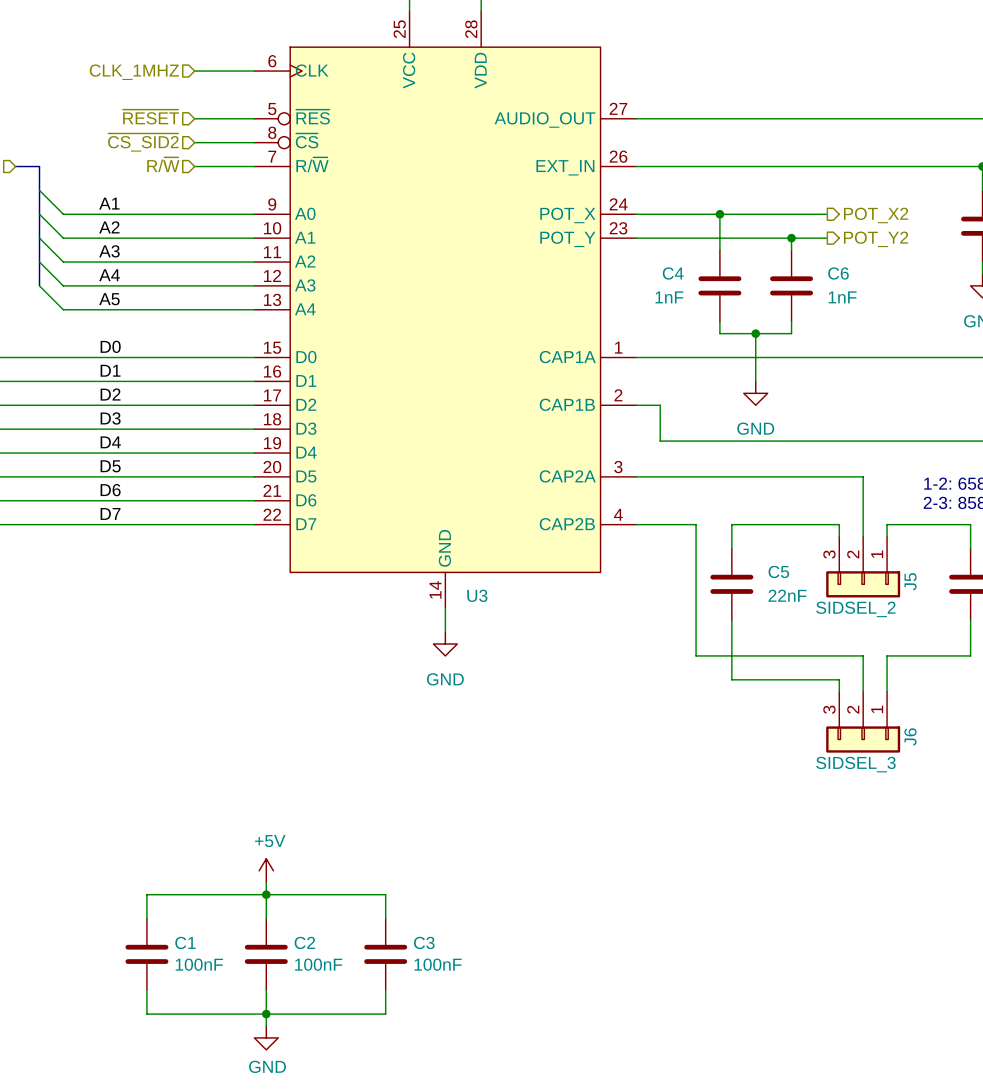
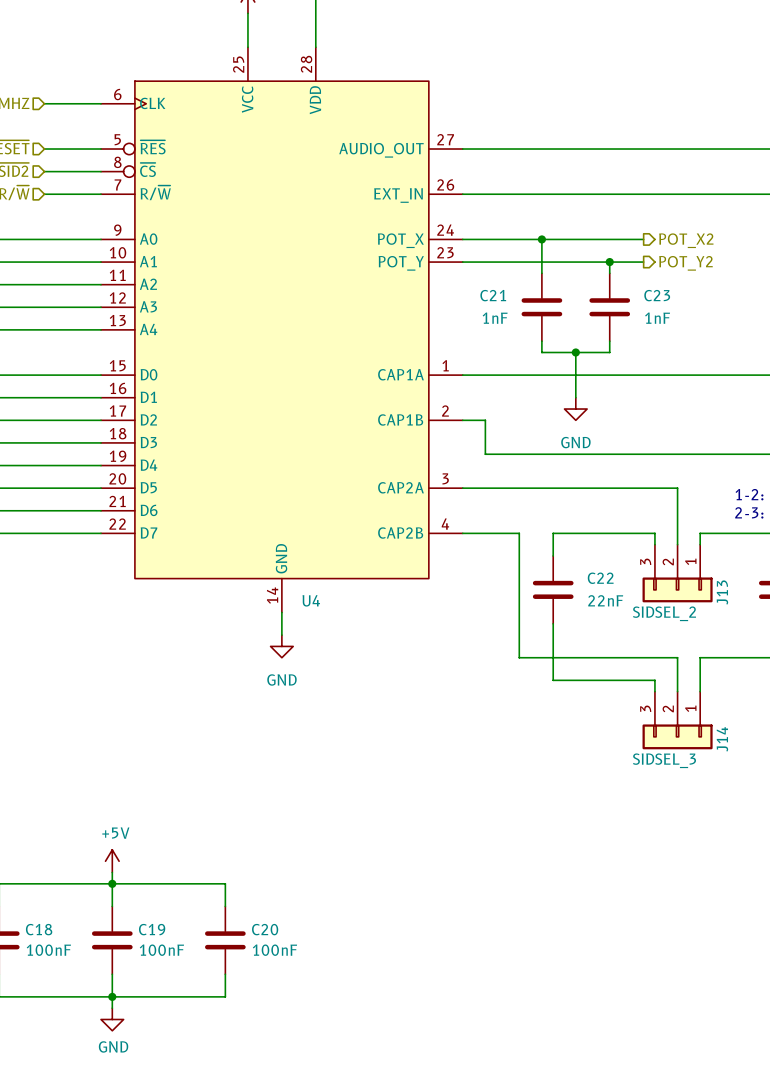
C4 name: C4 (673, 273) -> C21 (493, 295)
C6 name: C6 (838, 273) -> C23 (657, 295)
C5 name: C5 (778, 571) -> C22 (600, 578)
J5 name: J5 (910, 581) -> J13 (722, 592)
U3 name: U3 (477, 595) -> U4 (311, 600)
J6 name: J6 (910, 736) -> J14 (722, 739)
C1 name: C1 (185, 942) -> C18 (39, 929)
C2 name: C2 (304, 942) -> C19 (152, 929)
C3 name: C3 (424, 942) -> C20 (265, 929)

